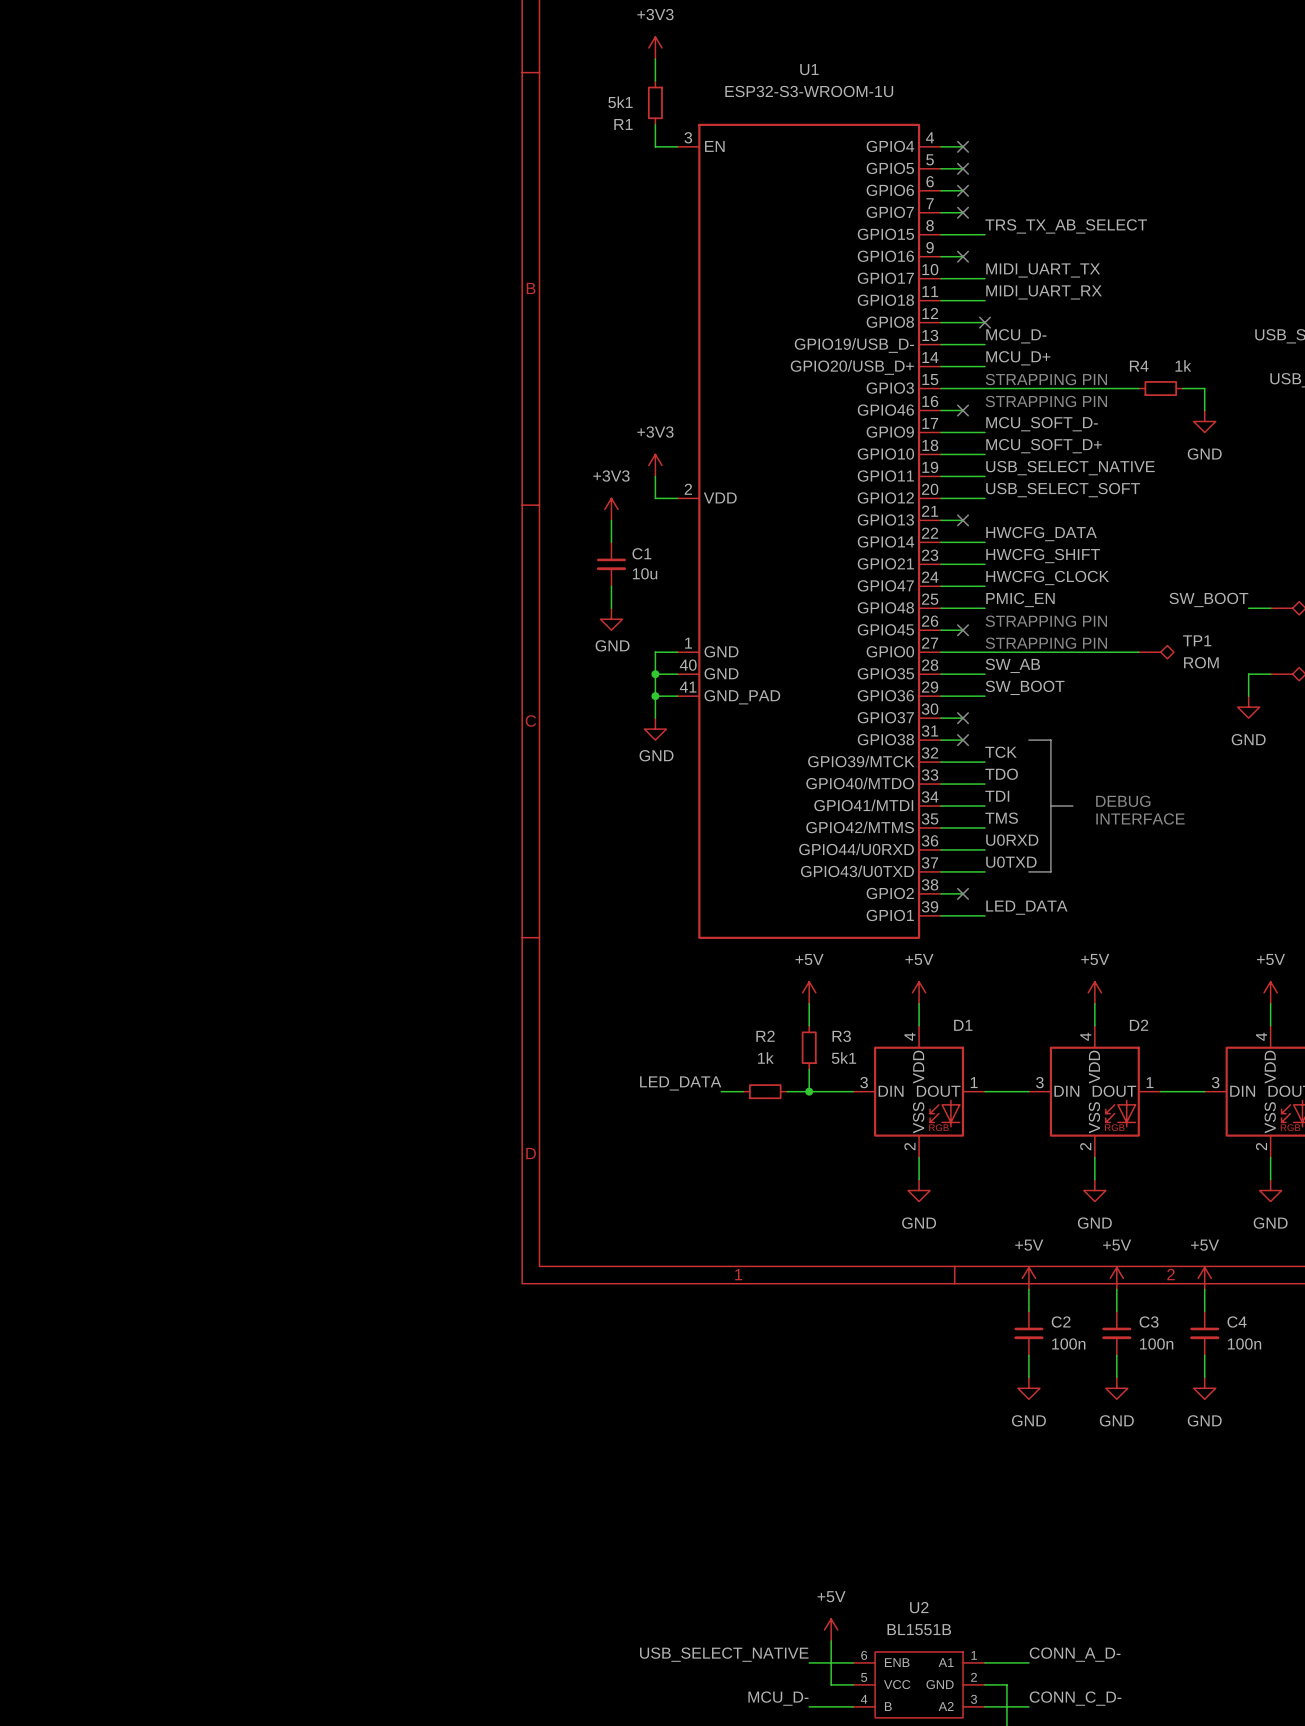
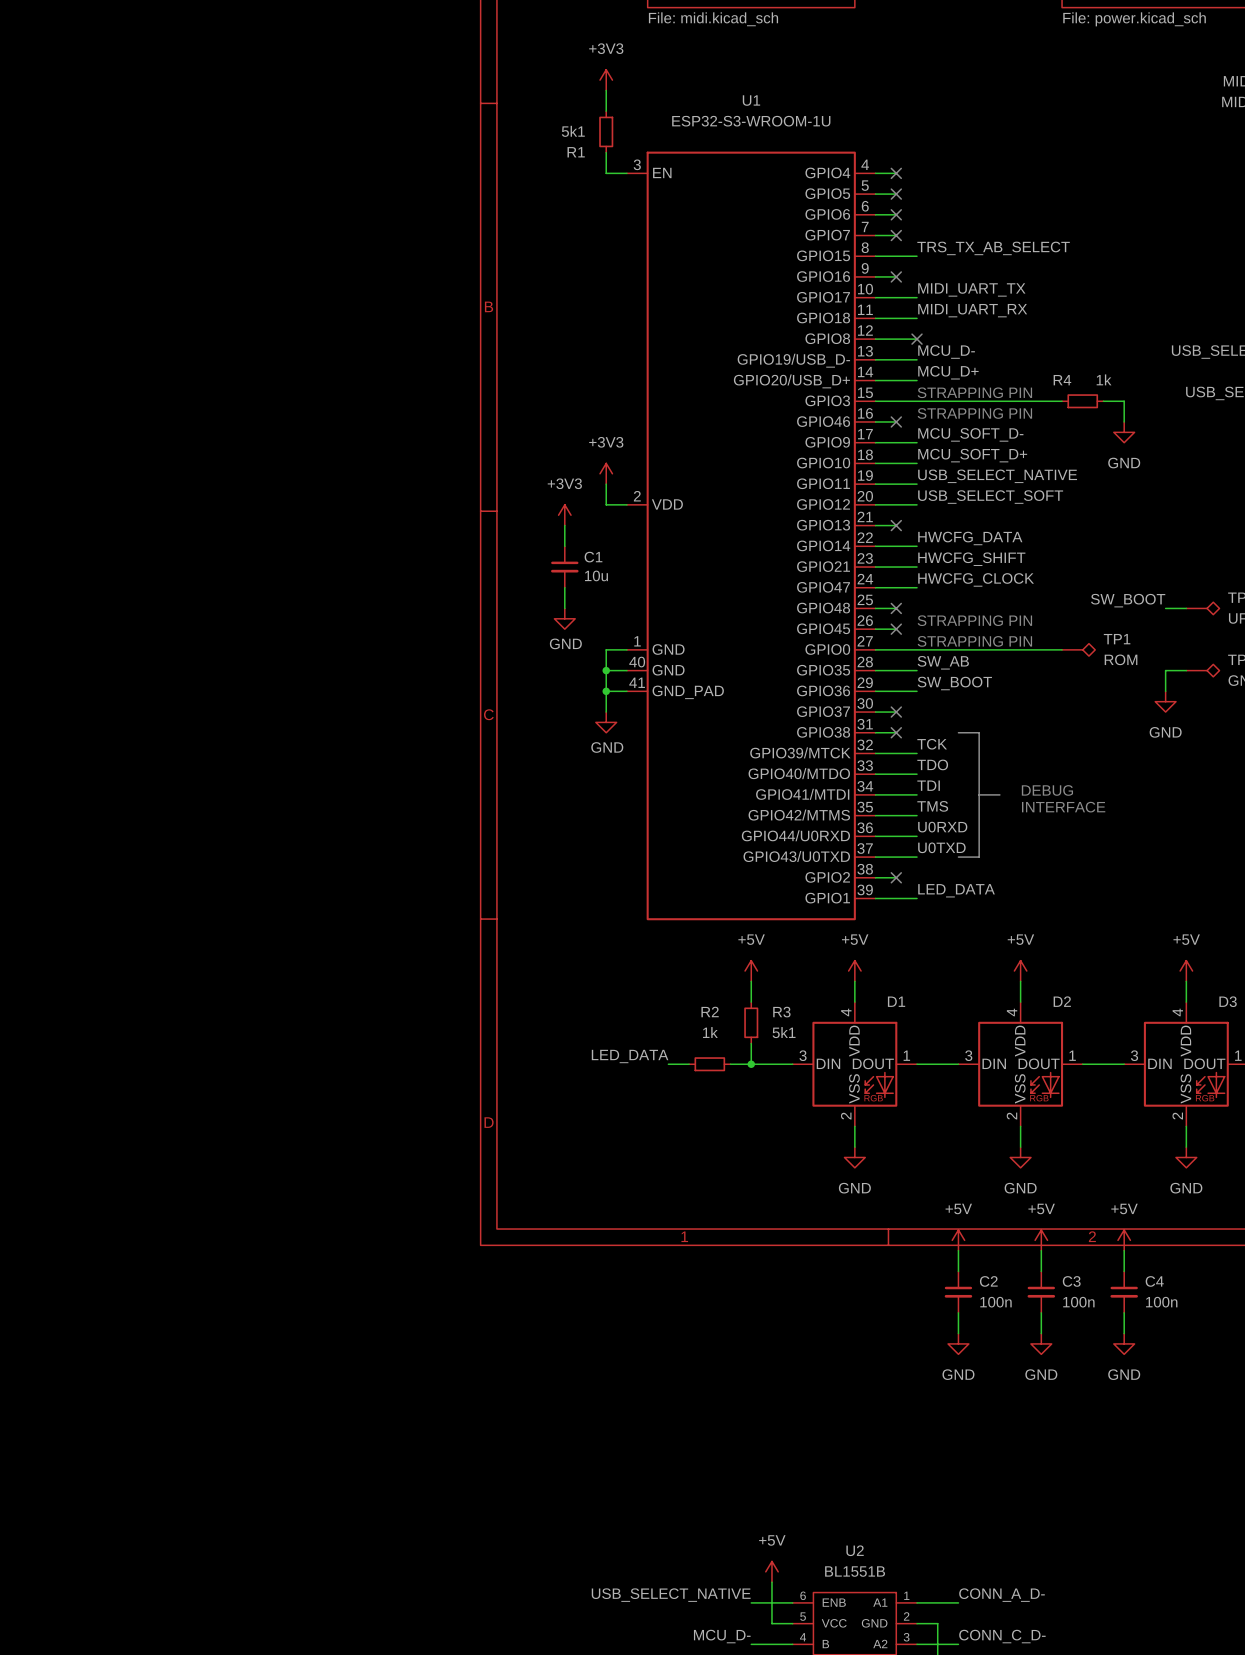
label: PMIC_EN (1020, 599) -> none
wire: (963, 608) (984, 608) -> none
no-connect mark: none -> (896, 608)

